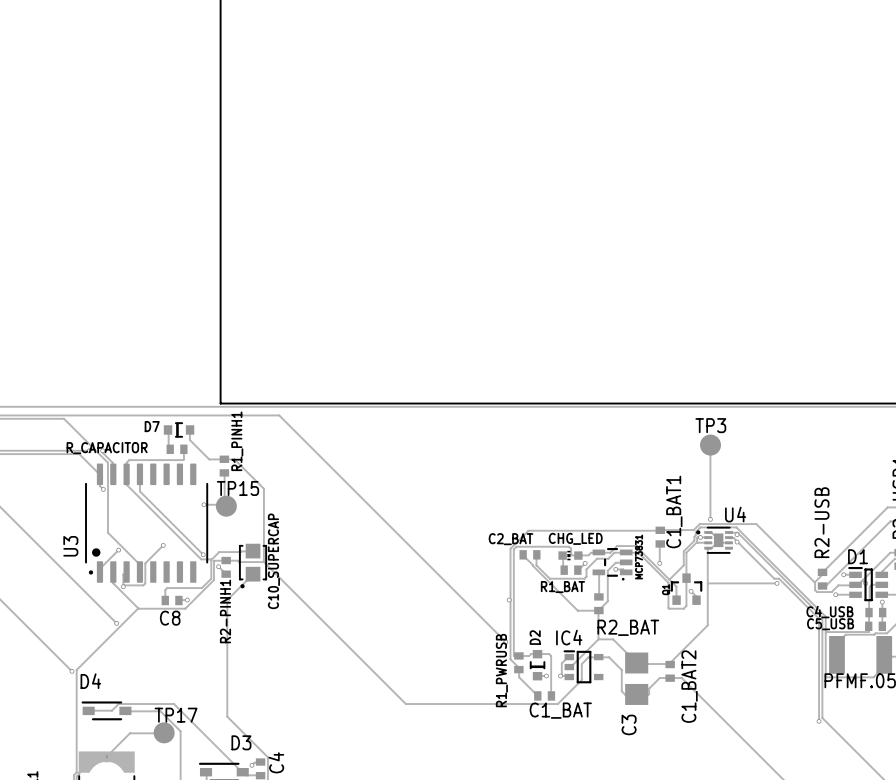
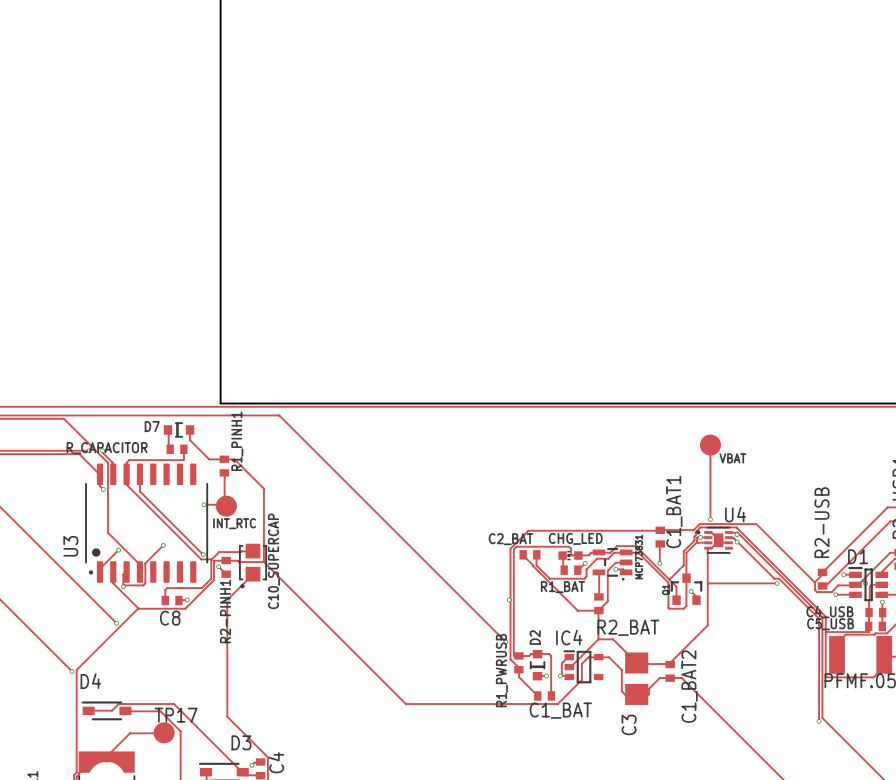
TP3 name: TP3 (710, 425) -> none
text: none -> VBAT (732, 458)
TP15 name: TP15 (238, 488) -> none
text: none -> INT_RTC (234, 523)

